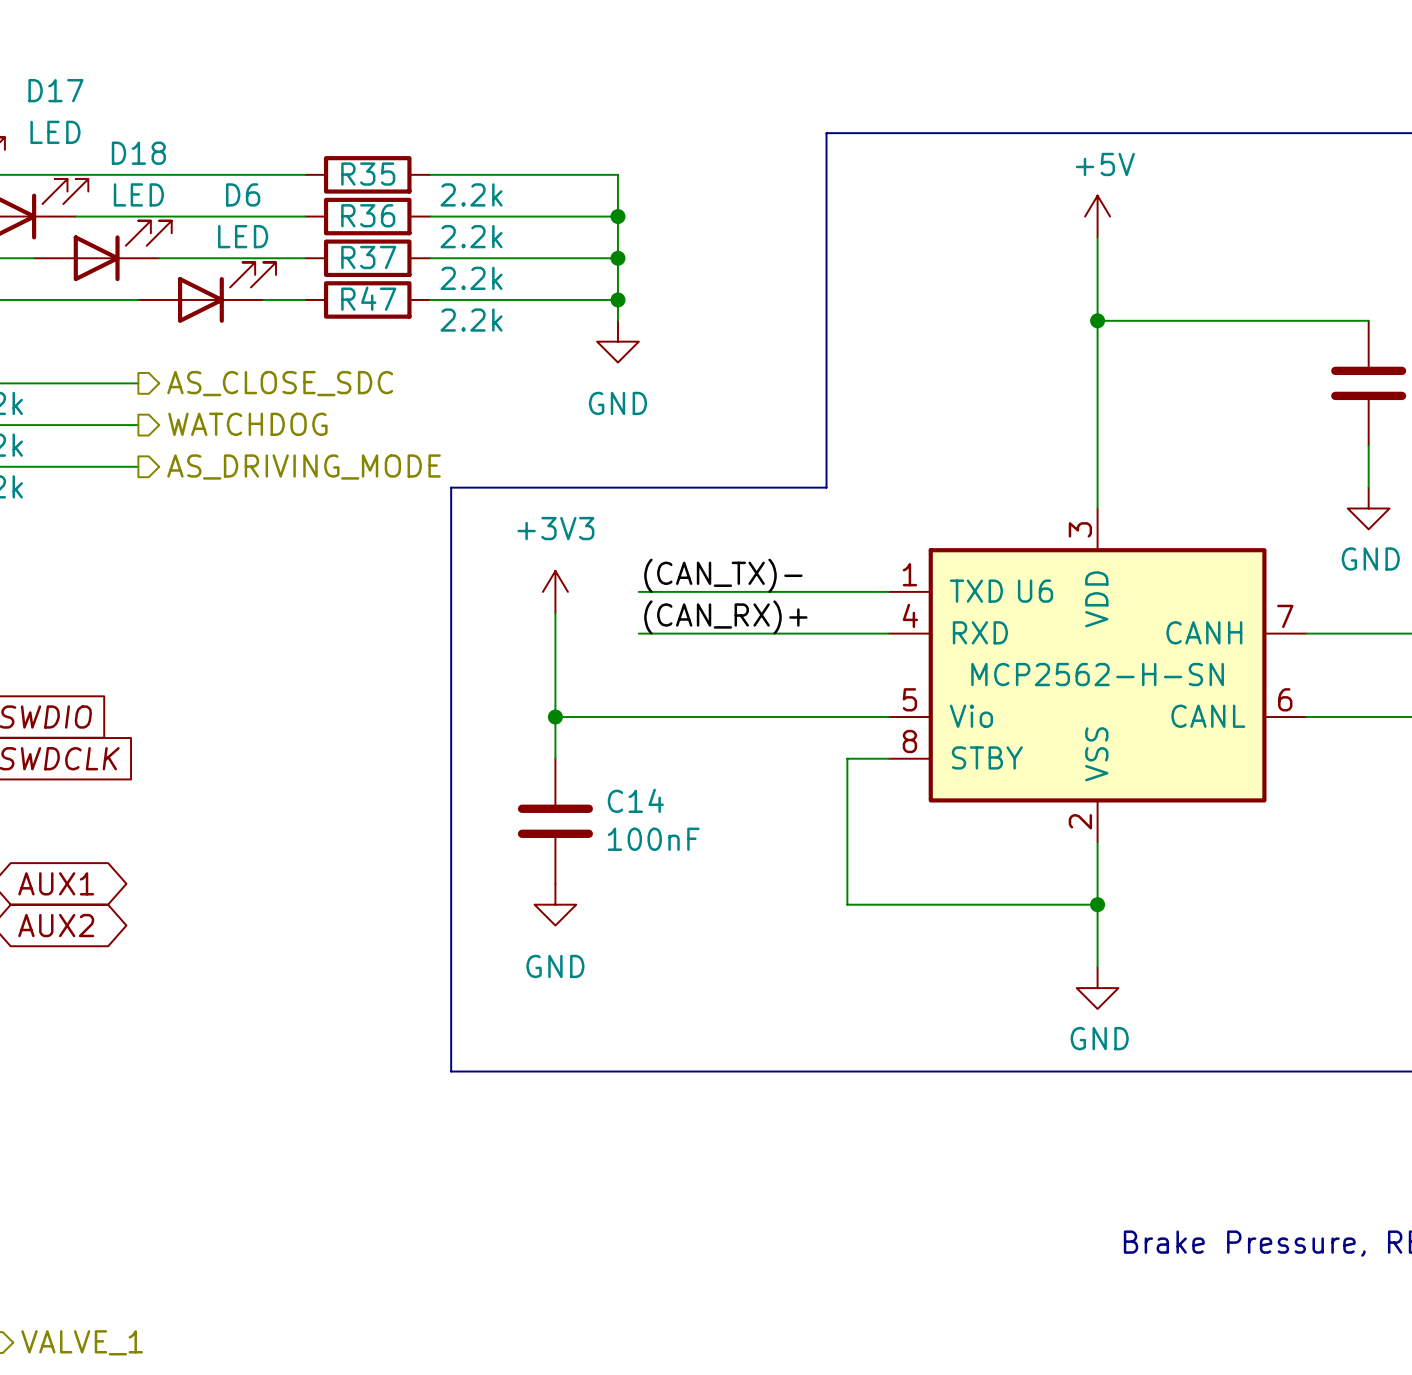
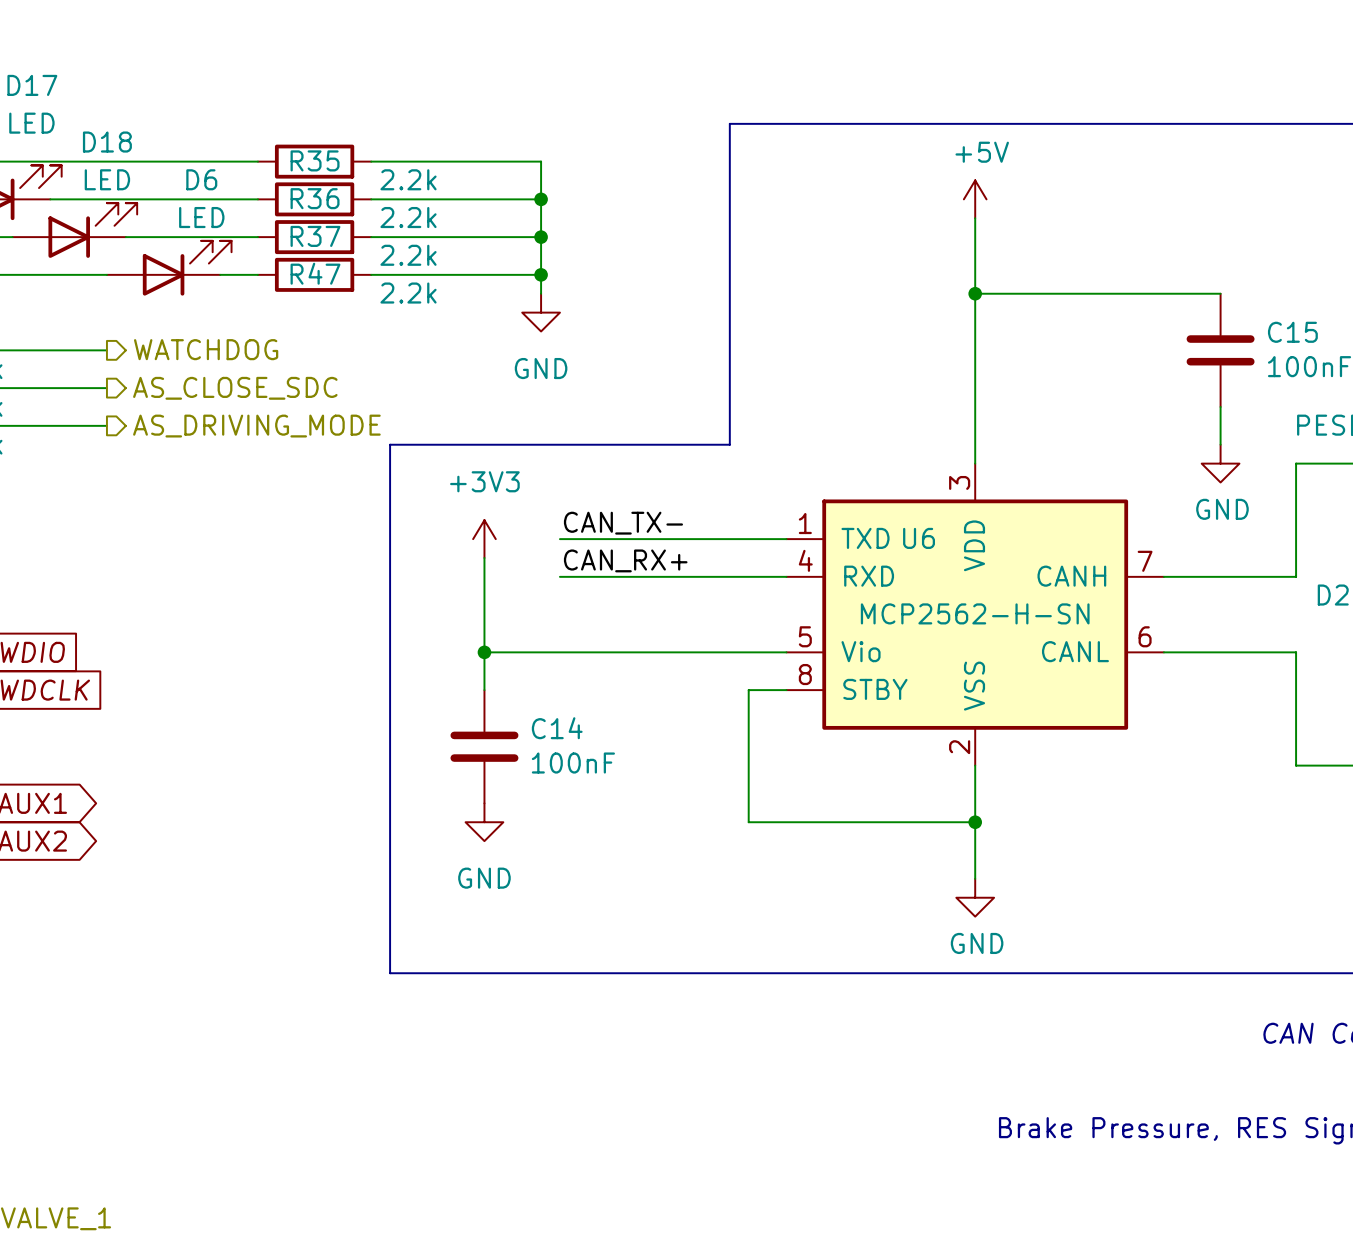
hierarchical label: AS_CLOSE_SDC (280, 383) -> WATCHDOG (206, 349)
hierarchical label: WATCHDOG (247, 424) -> AS_CLOSE_SDC (235, 388)
label: (CAN_TX)- (723, 575) -> CAN_TX- (623, 523)
label: (CAN_RX)+ (725, 617) -> CAN_RX+ (625, 560)

